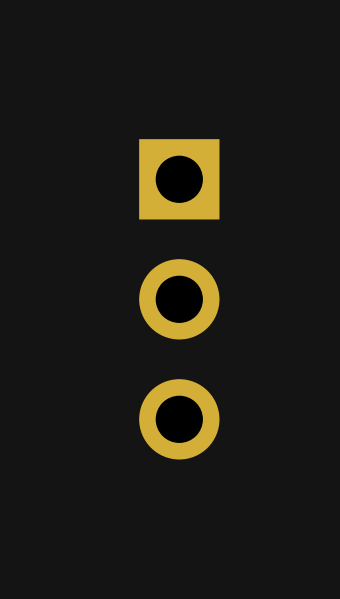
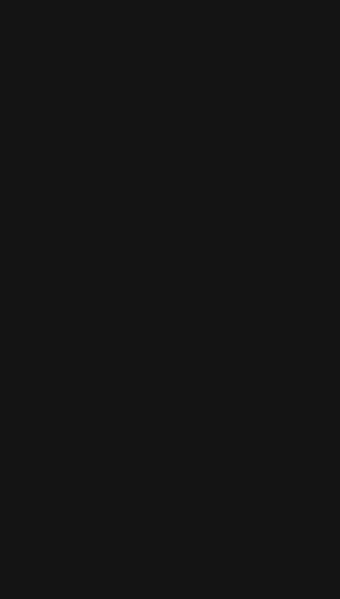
part: (179, 299) -> none

